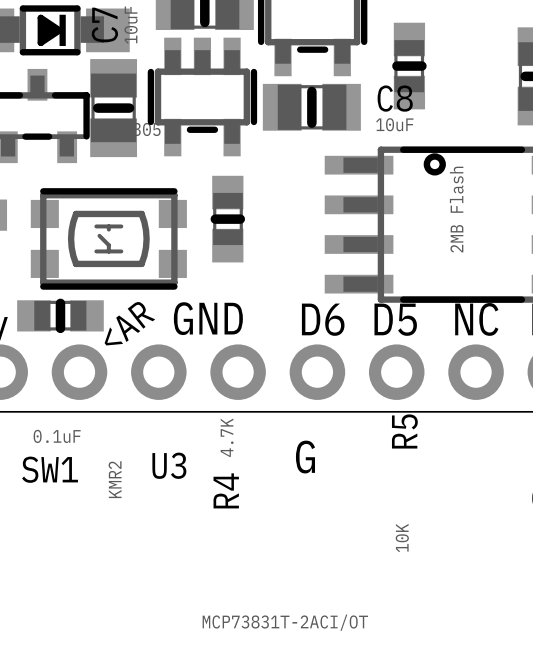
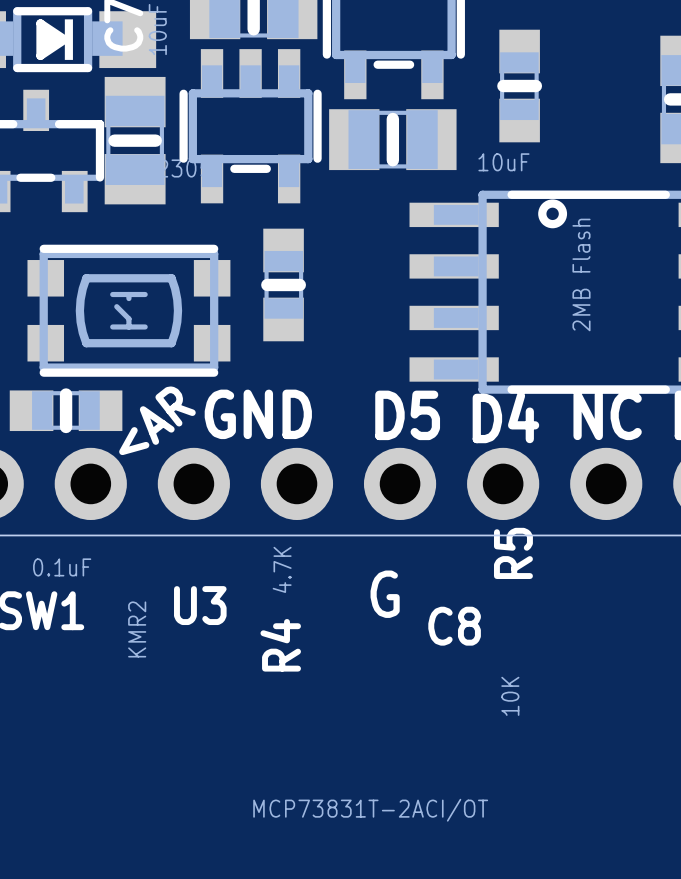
C8 name position: C8 (395, 98) -> C8 (454, 626)
text: D6 (323, 319) -> D5 (407, 415)
text: D5 (395, 319) -> D4 (505, 417)

